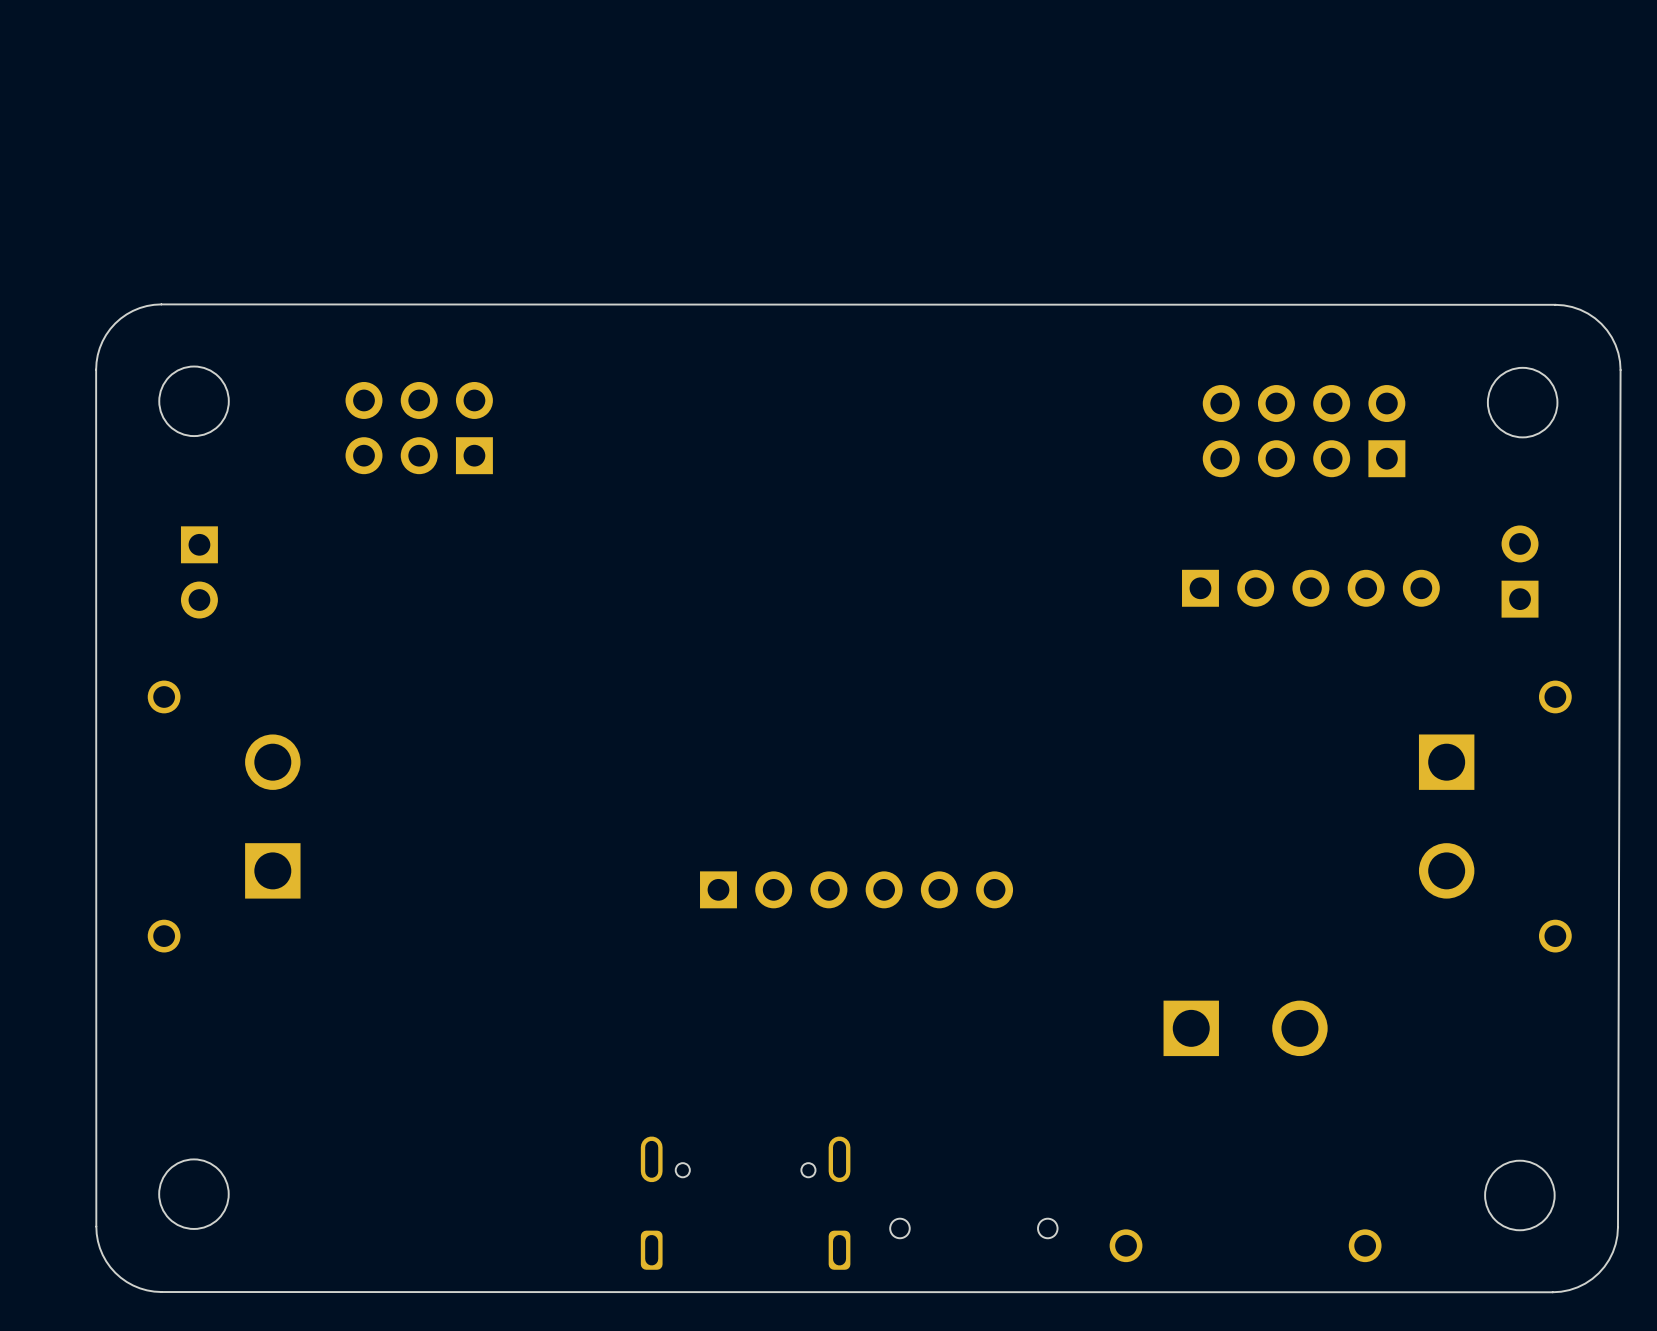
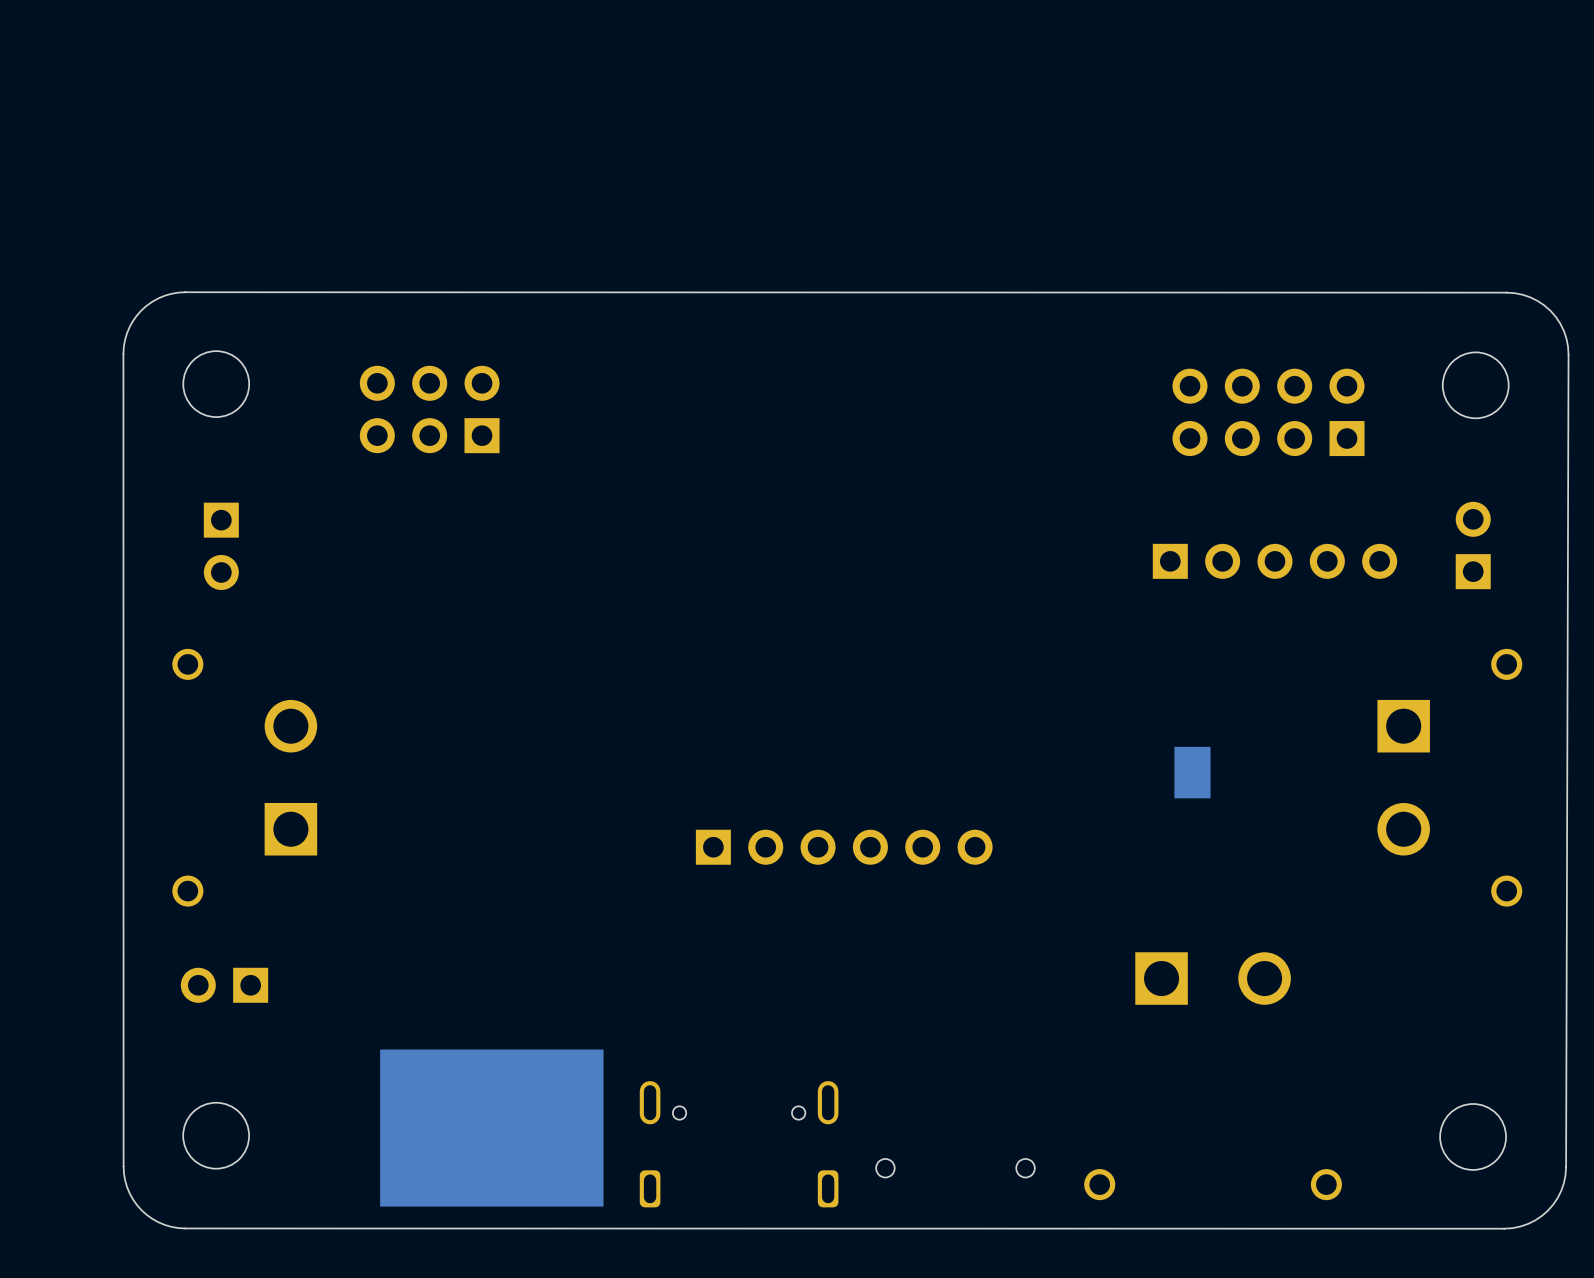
part: none -> (1192, 772)
part: none -> (224, 985)
part: none -> (491, 1128)

